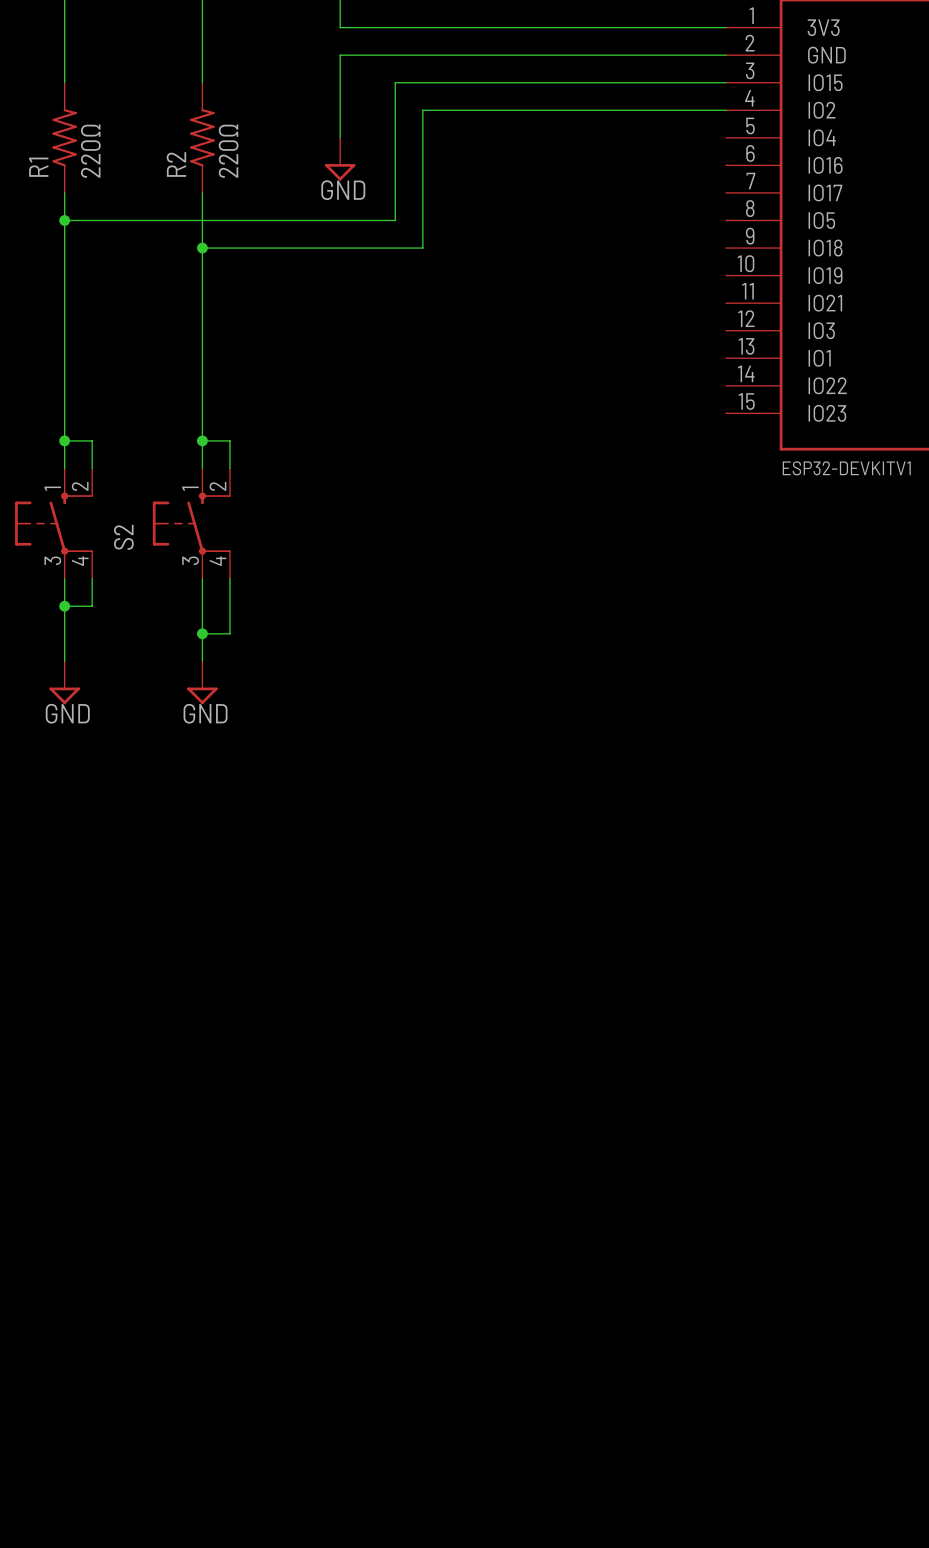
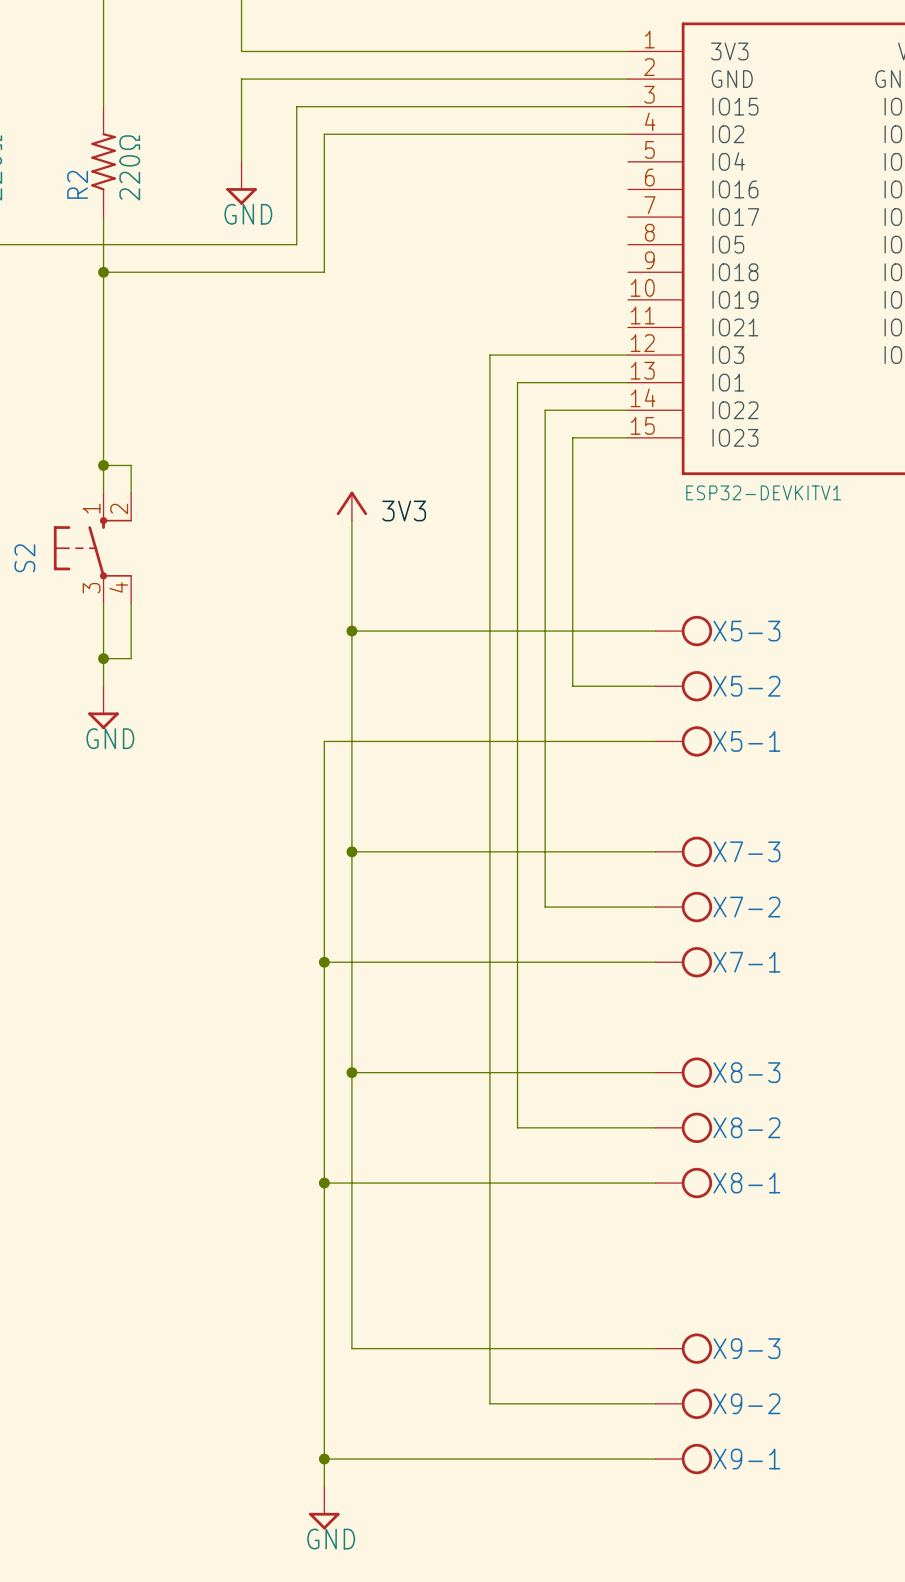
wire: none -> (627, 355) (489, 355) (489, 1403) (655, 1403)
wire: none -> (627, 382) (517, 382) (517, 1127) (655, 1127)
wire: none -> (627, 410) (545, 410) (545, 907) (655, 907)
wire: none -> (627, 437) (572, 437) (572, 686) (655, 686)
power symbol: none -> (351, 506)
label: none -> 3V3 (404, 510)
wire: none -> (351, 520) (351, 1348) (655, 1348)
wire: none -> (351, 631) (655, 631)
junction: none -> (351, 631)
X5-3: none -> (683, 631)
X5-2: none -> (683, 686)
wire: none -> (655, 741) (324, 741) (324, 1486)
X5-1: none -> (683, 741)
wire: none -> (351, 851) (655, 851)
junction: none -> (351, 851)
X7-3: none -> (683, 851)
X7-2: none -> (683, 907)
wire: none -> (324, 962) (655, 962)
junction: none -> (324, 962)
X7-1: none -> (683, 962)
wire: none -> (351, 1072) (655, 1072)
junction: none -> (351, 1072)
X8-3: none -> (683, 1072)
X8-2: none -> (683, 1127)
wire: none -> (324, 1183) (655, 1183)
junction: none -> (324, 1183)
X8-1: none -> (683, 1183)
X9-3: none -> (683, 1348)
X9-2: none -> (683, 1403)
wire: none -> (324, 1459) (655, 1459)
junction: none -> (324, 1459)
X9-1: none -> (683, 1459)
power symbol: none -> GND (324, 1508)

